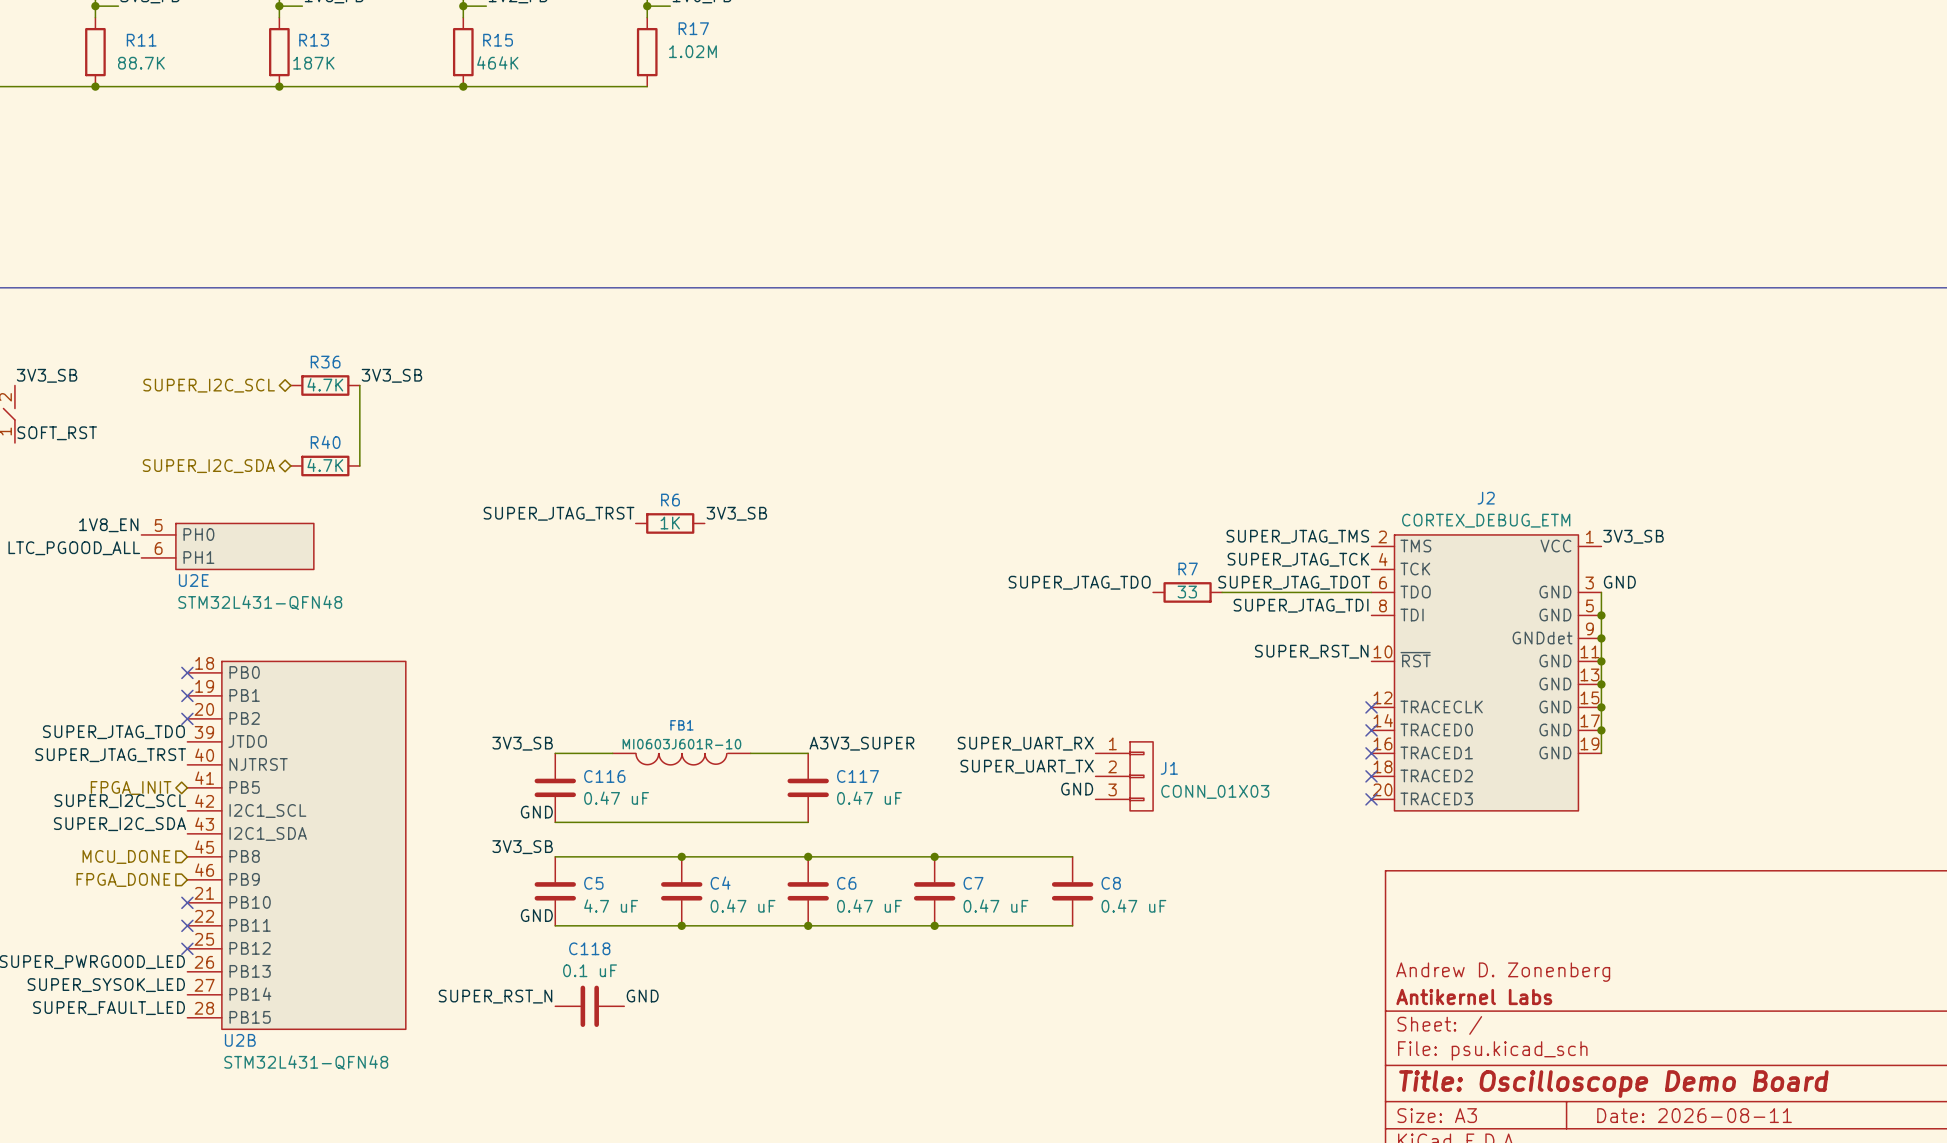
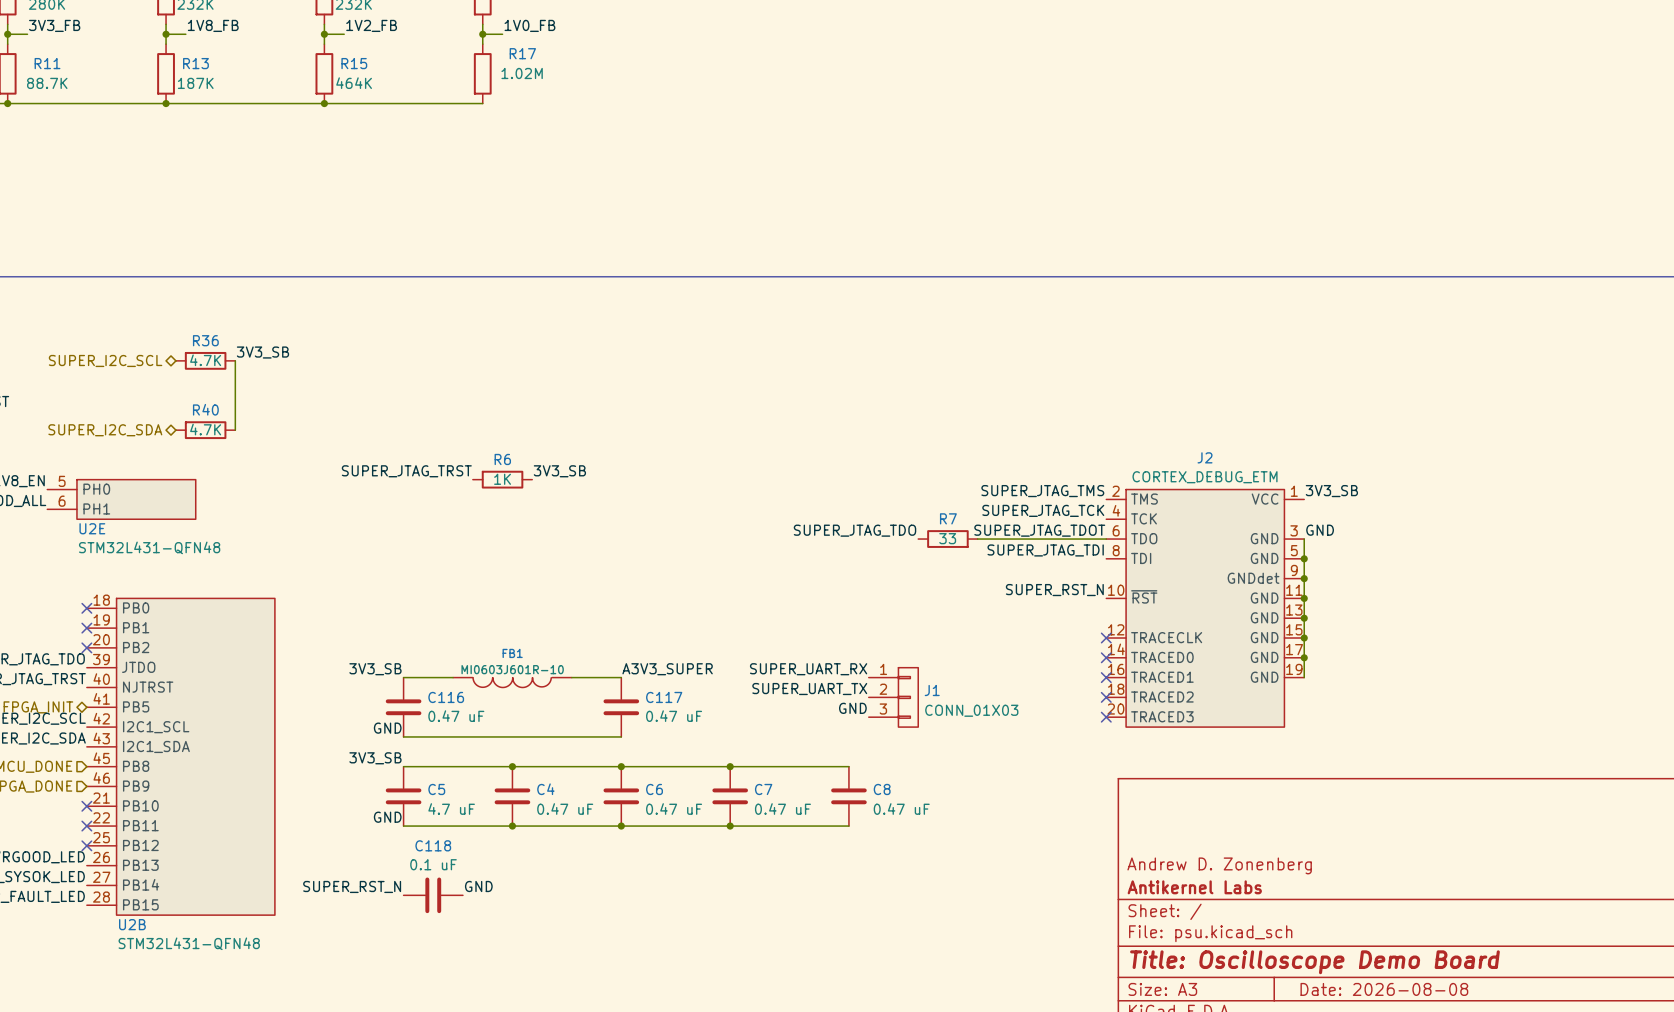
title block: Date: 2026-08-11 (1694, 1115) -> Date: 2026-08-08 (1384, 989)

